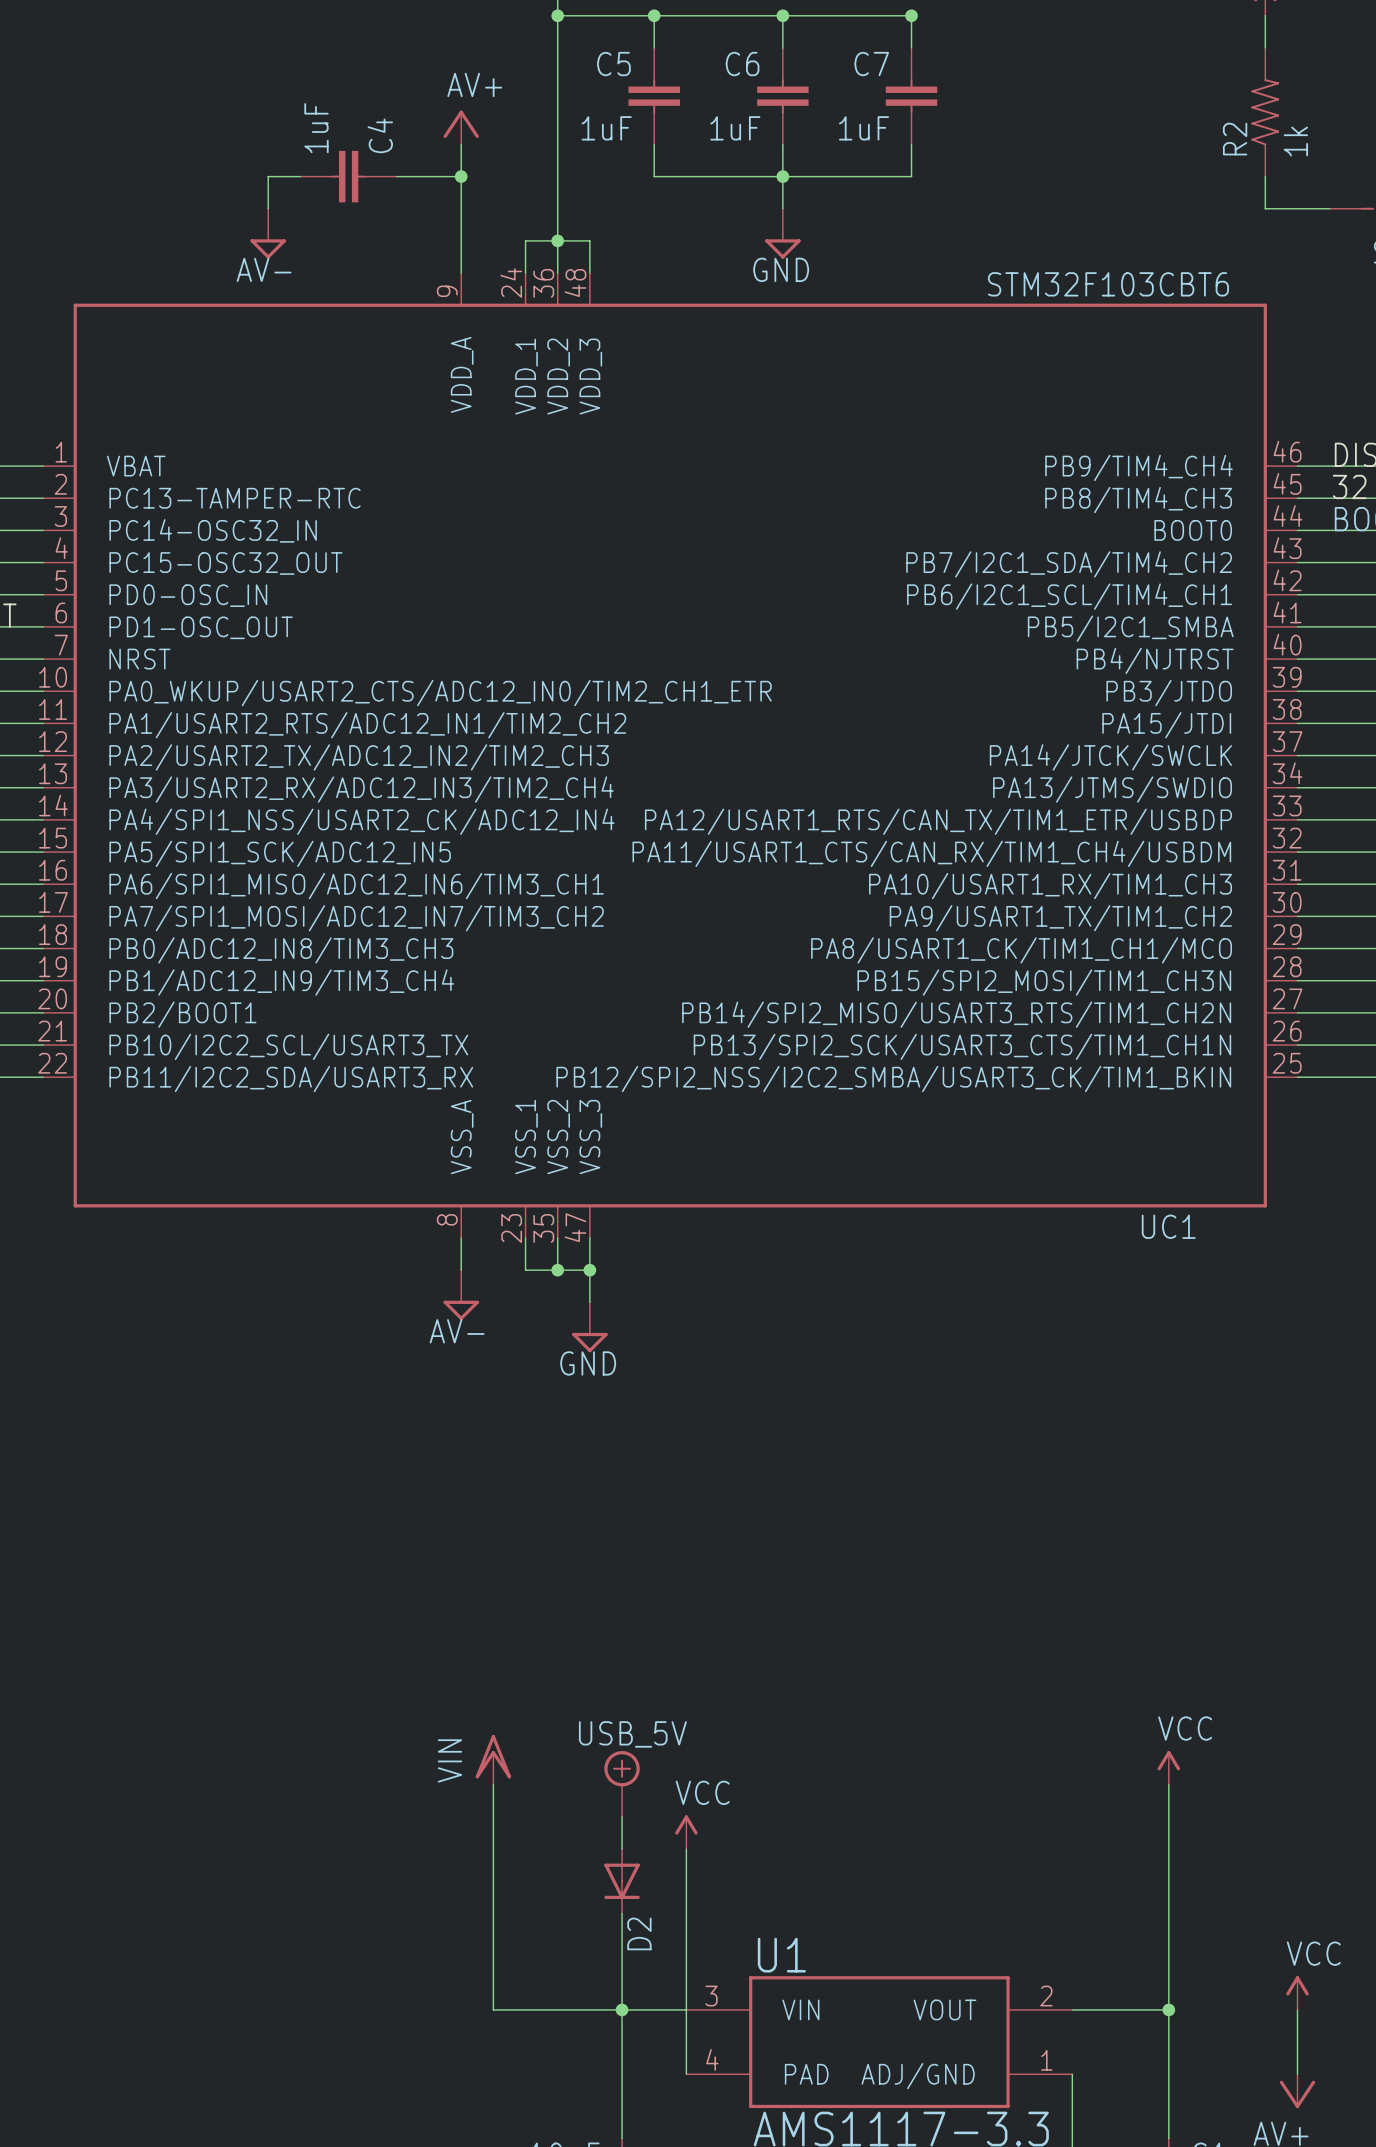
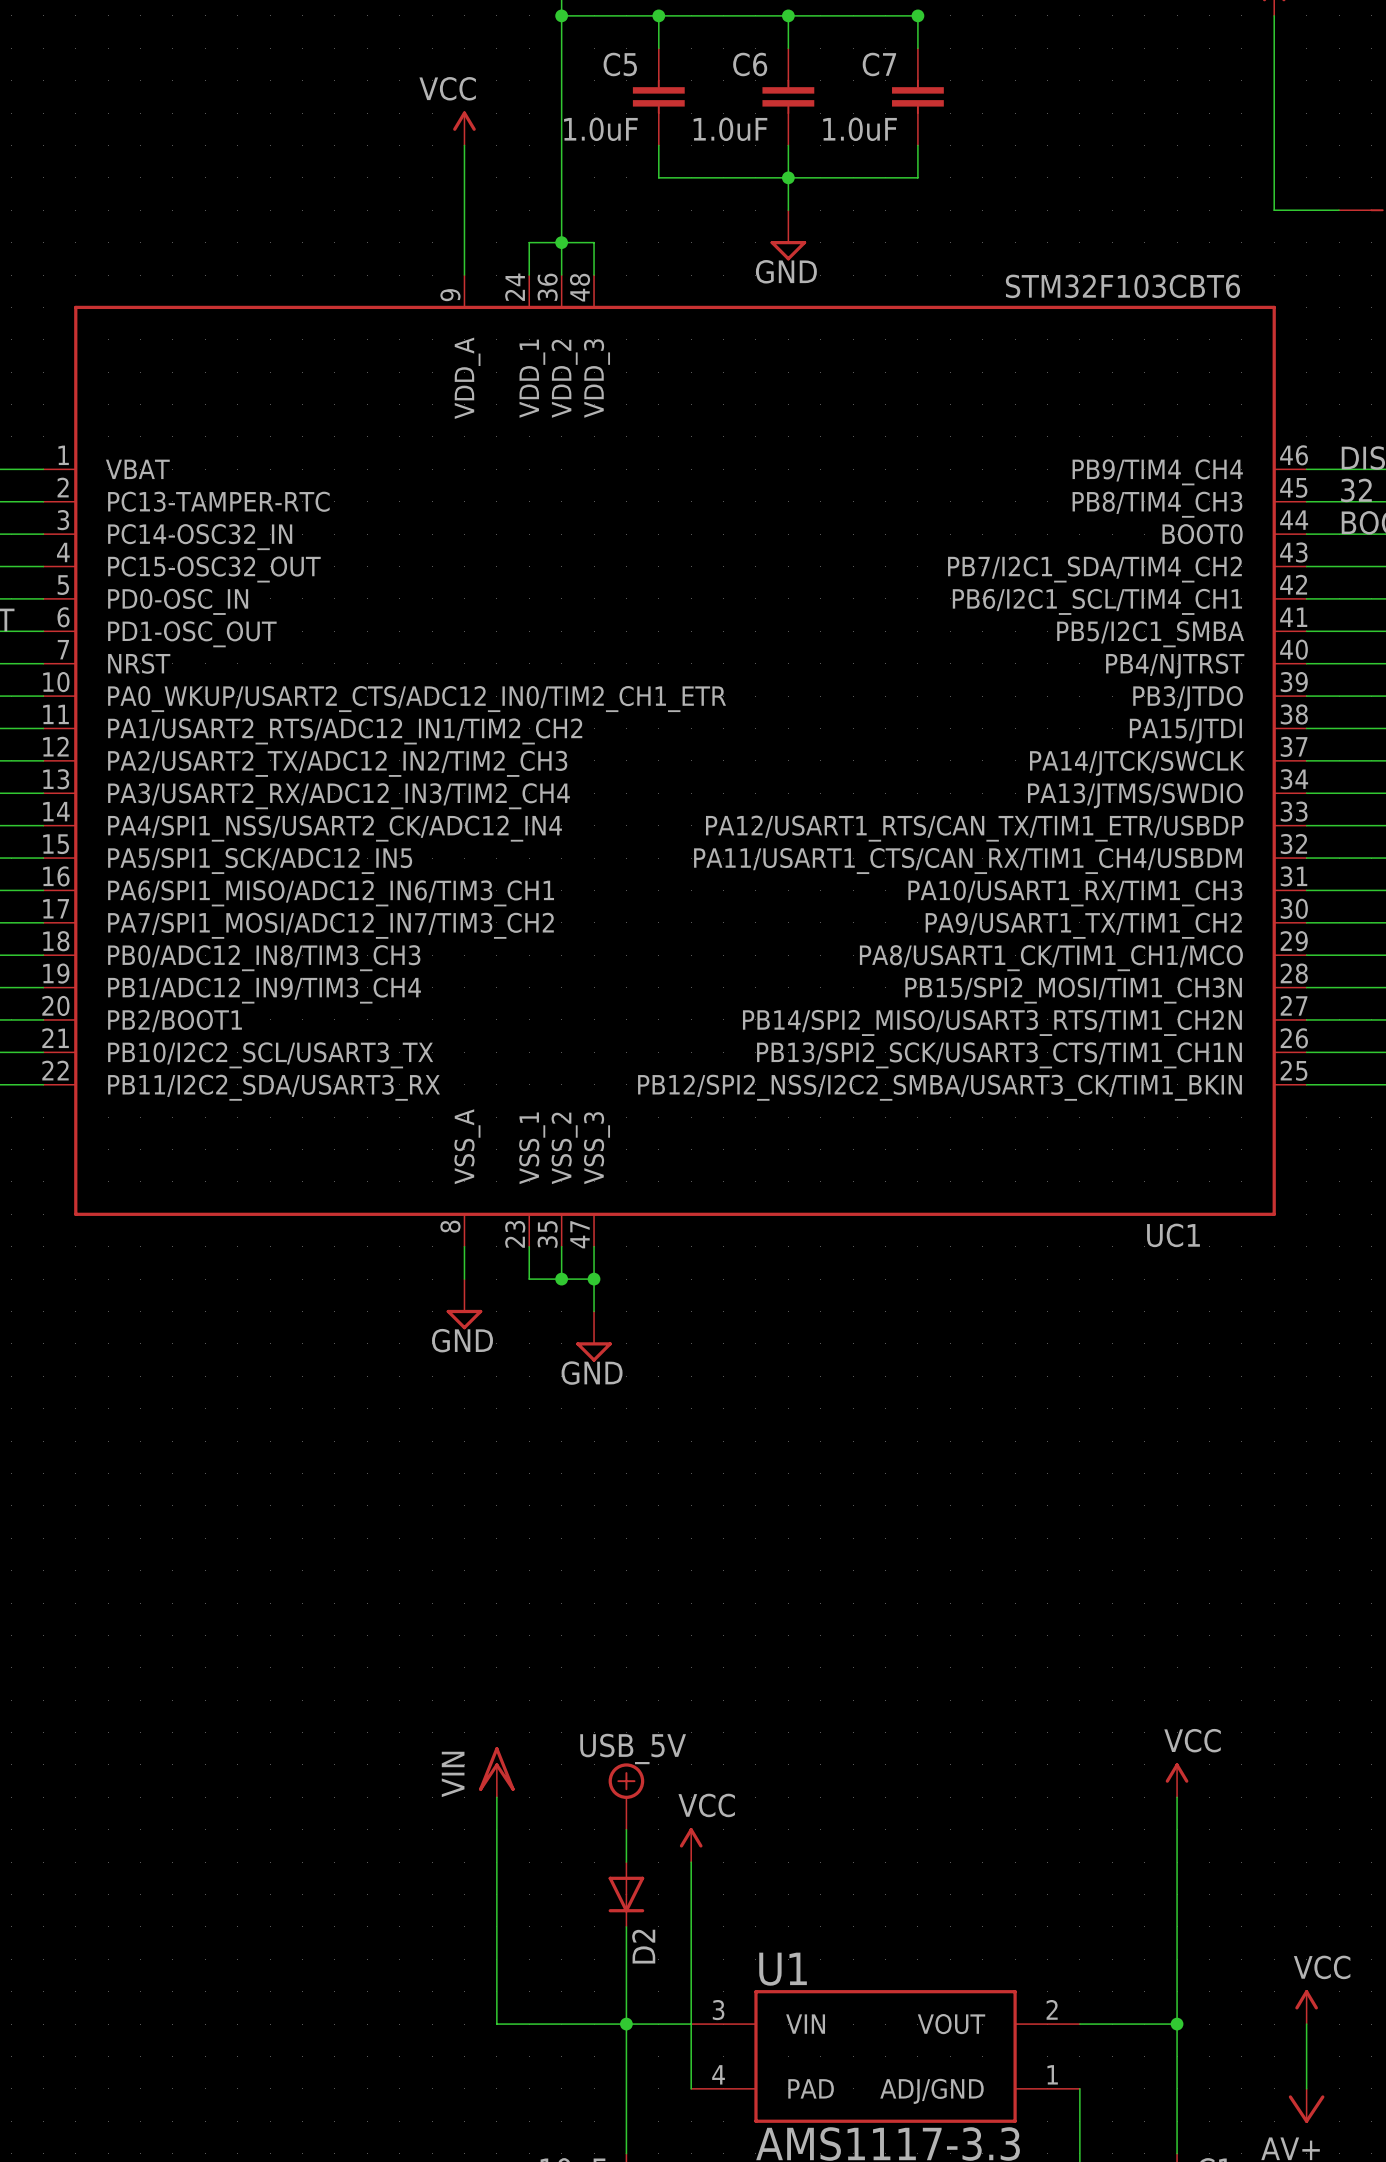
R2: 1k (1265, 112) -> none
power symbol: AV+ (461, 127) -> VCC (464, 128)
C5 value: 1uF (606, 128) -> 1.0uF (600, 129)
C6 value: 1uF (735, 128) -> 1.0uF (730, 129)
C7 value: 1uF (864, 128) -> 1.0uF (860, 129)
wire: (300, 176) (268, 176) (268, 208) -> none
C4: 1uF (348, 176) -> none
wire: (396, 176) (461, 176) -> none
junction: (461, 176) -> none
power symbol: AV- (268, 233) -> none
power symbol: AV- (461, 1295) -> GND (464, 1304)

